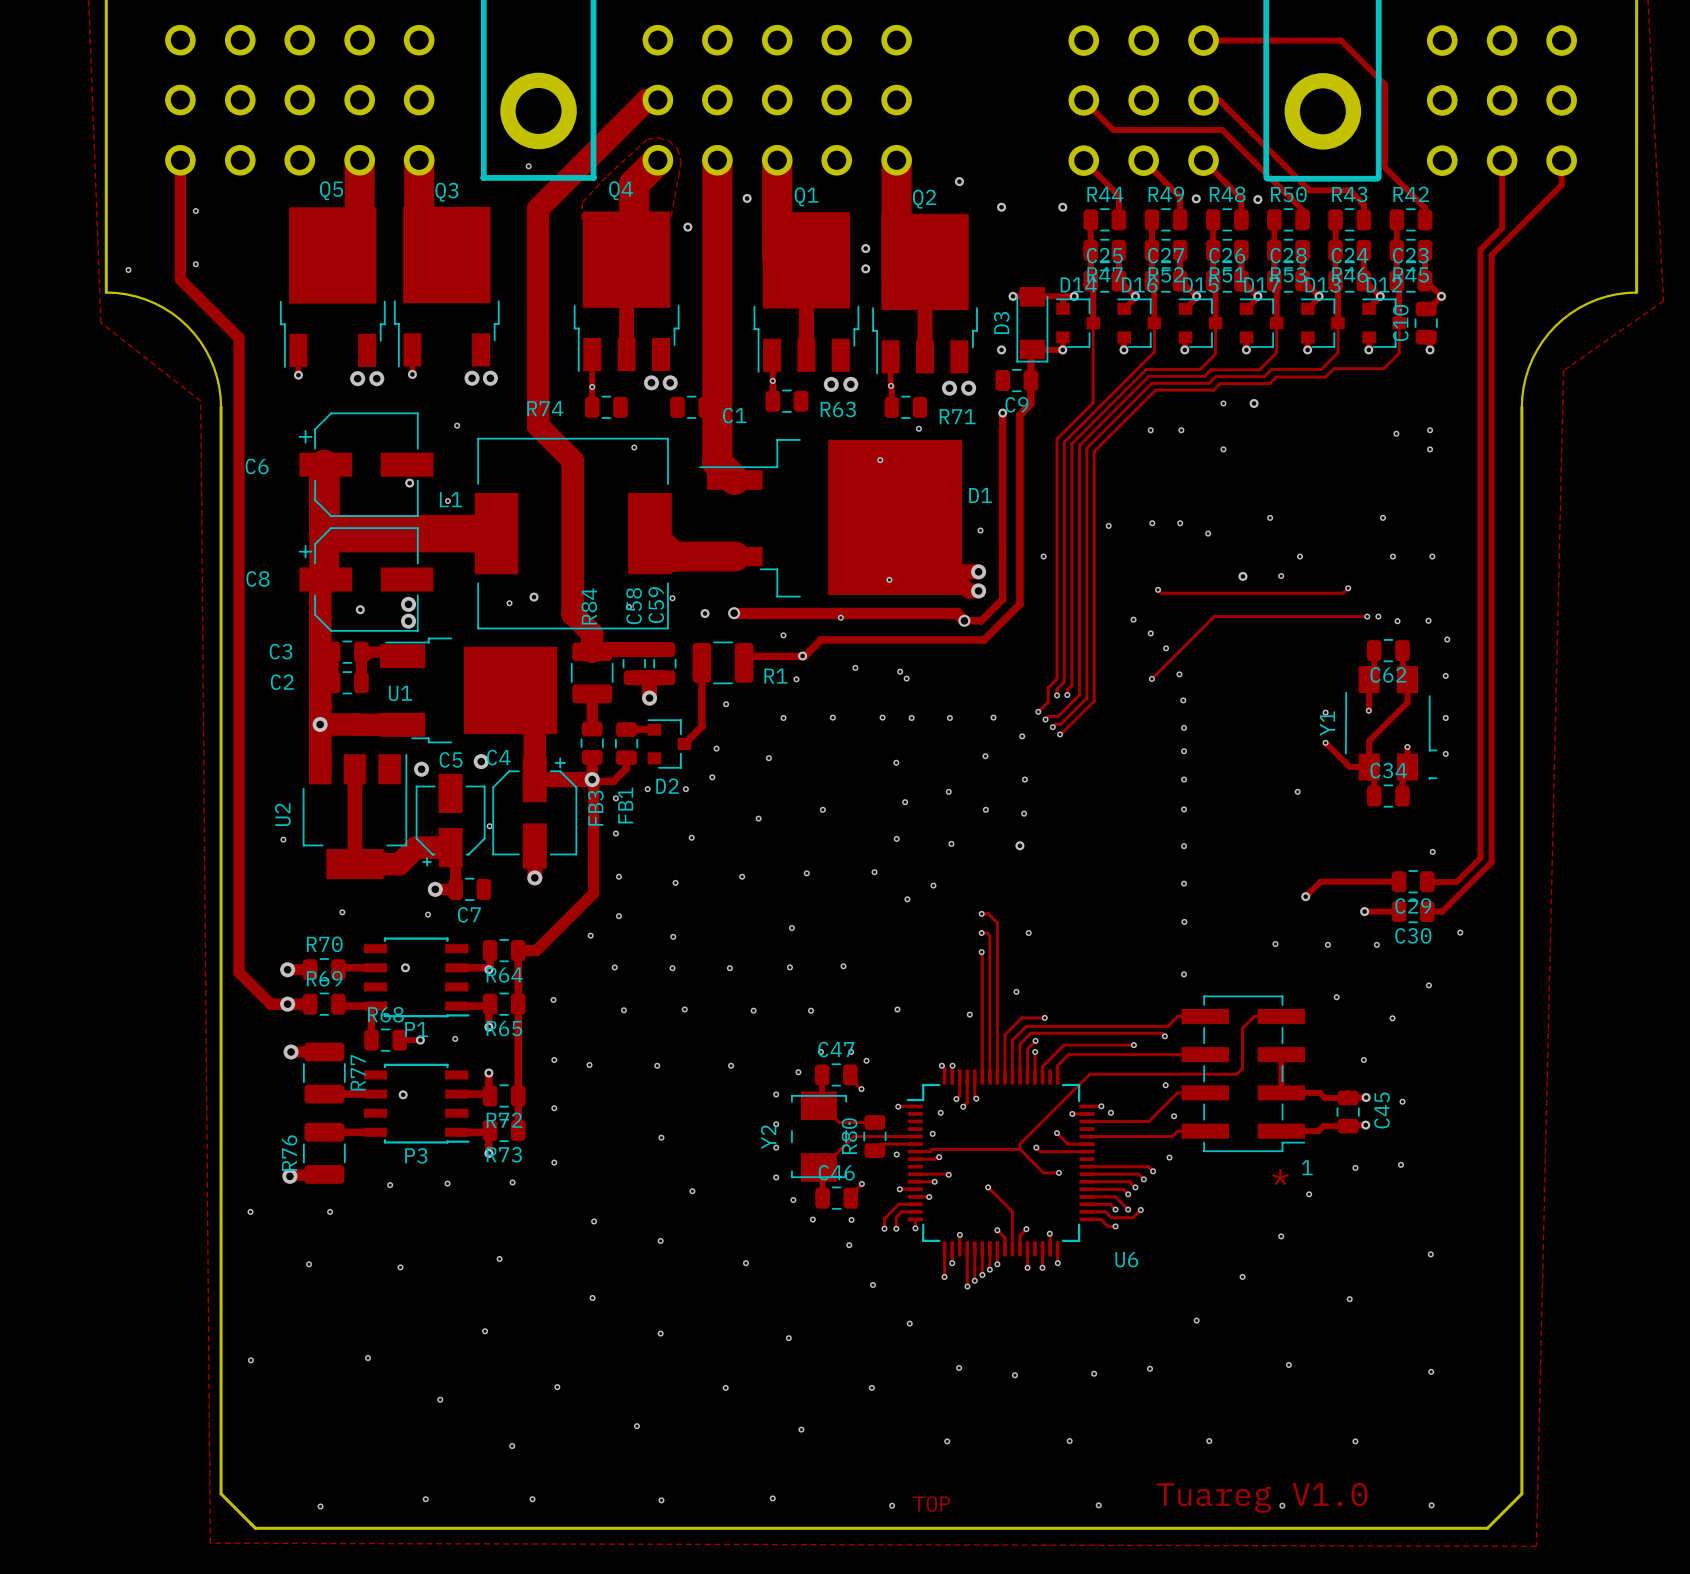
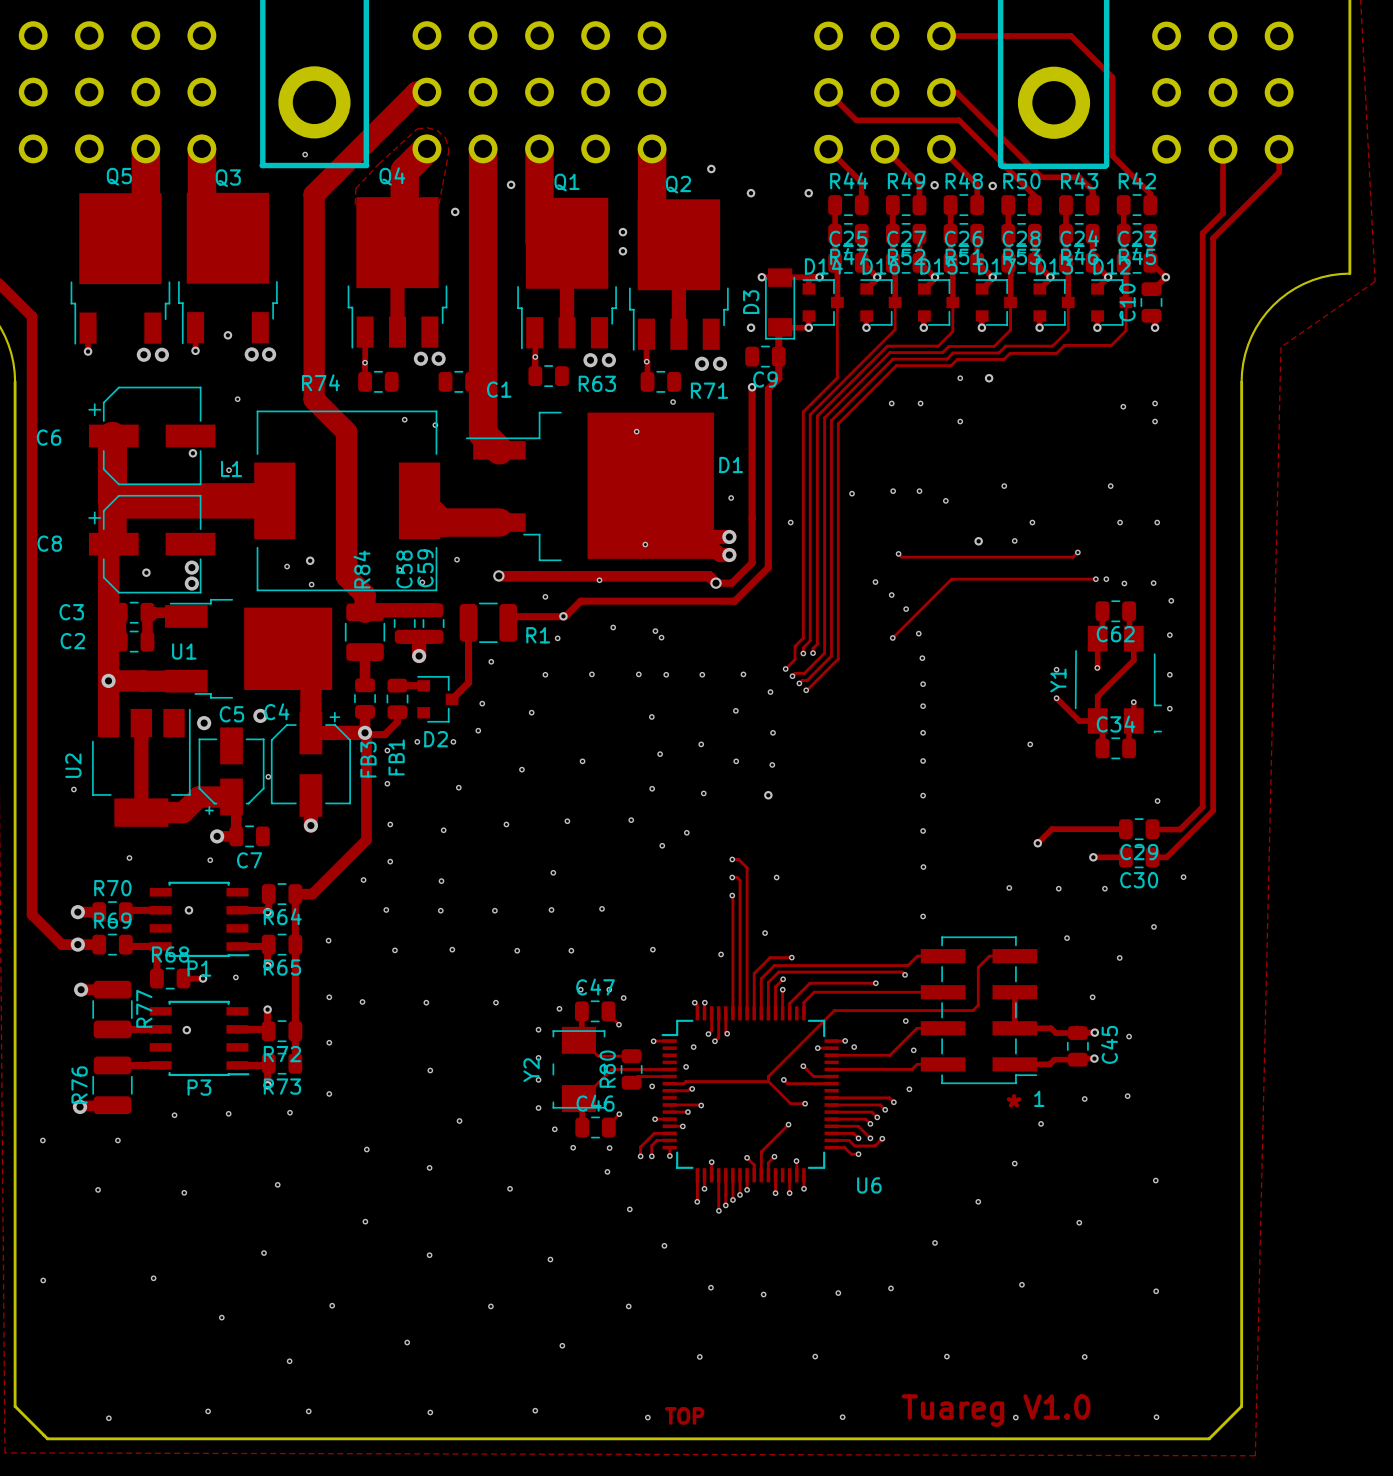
via: none -> (227, 335)
via: none -> (435, 425)
via: none -> (457, 559)
via: (672, 598) -> none
via: (705, 613) -> none
via: none -> (422, 582)
via: none -> (311, 584)
track: (988, 1187) (1012, 1211) (1012, 1223) -> (788, 1124) (761, 1151)
via position: (988, 1187) -> (788, 1124)

